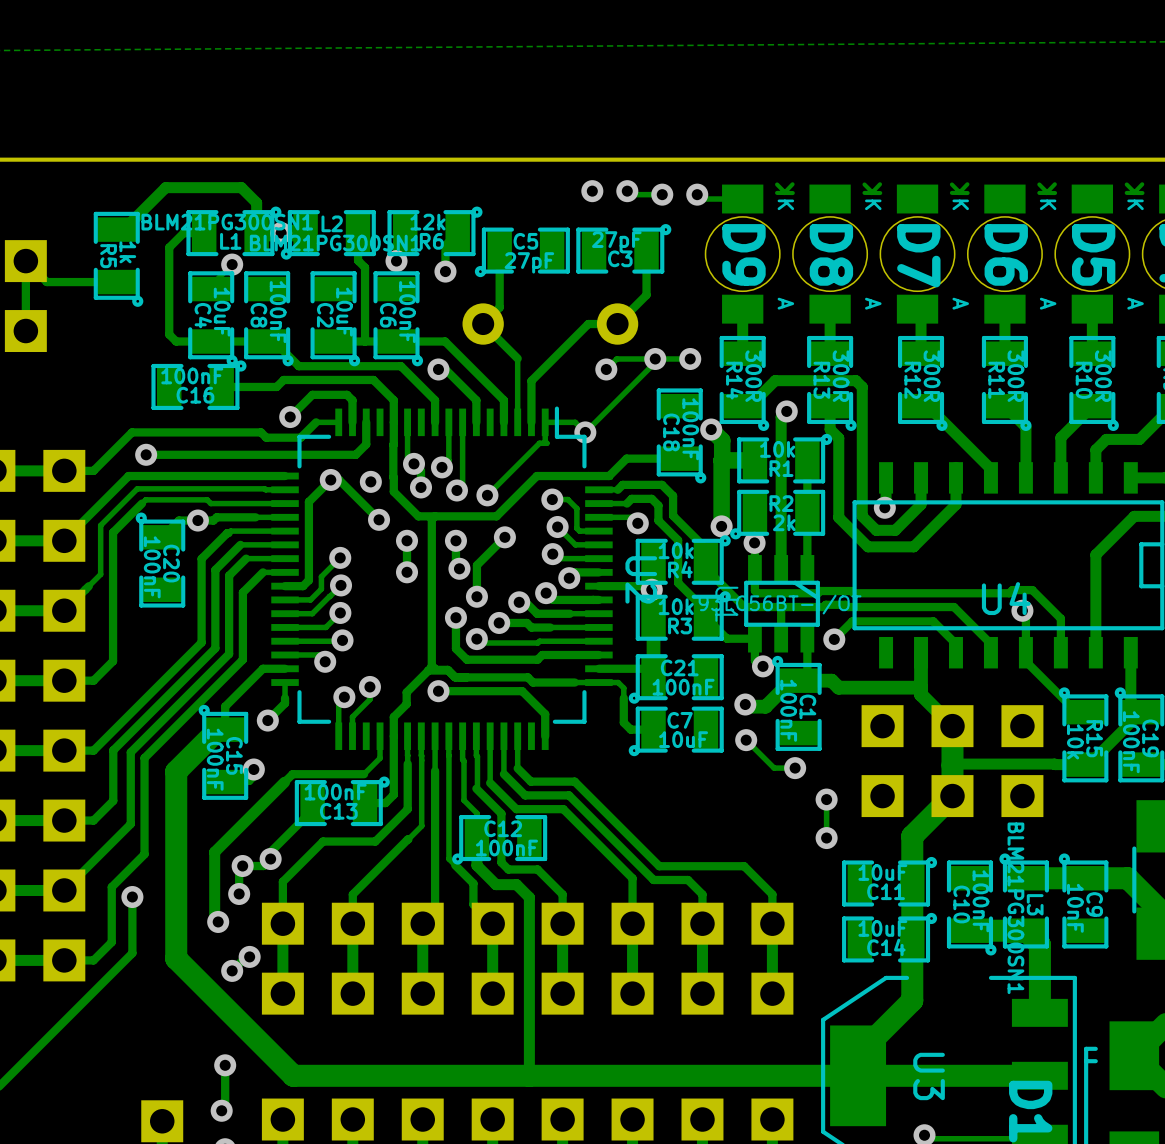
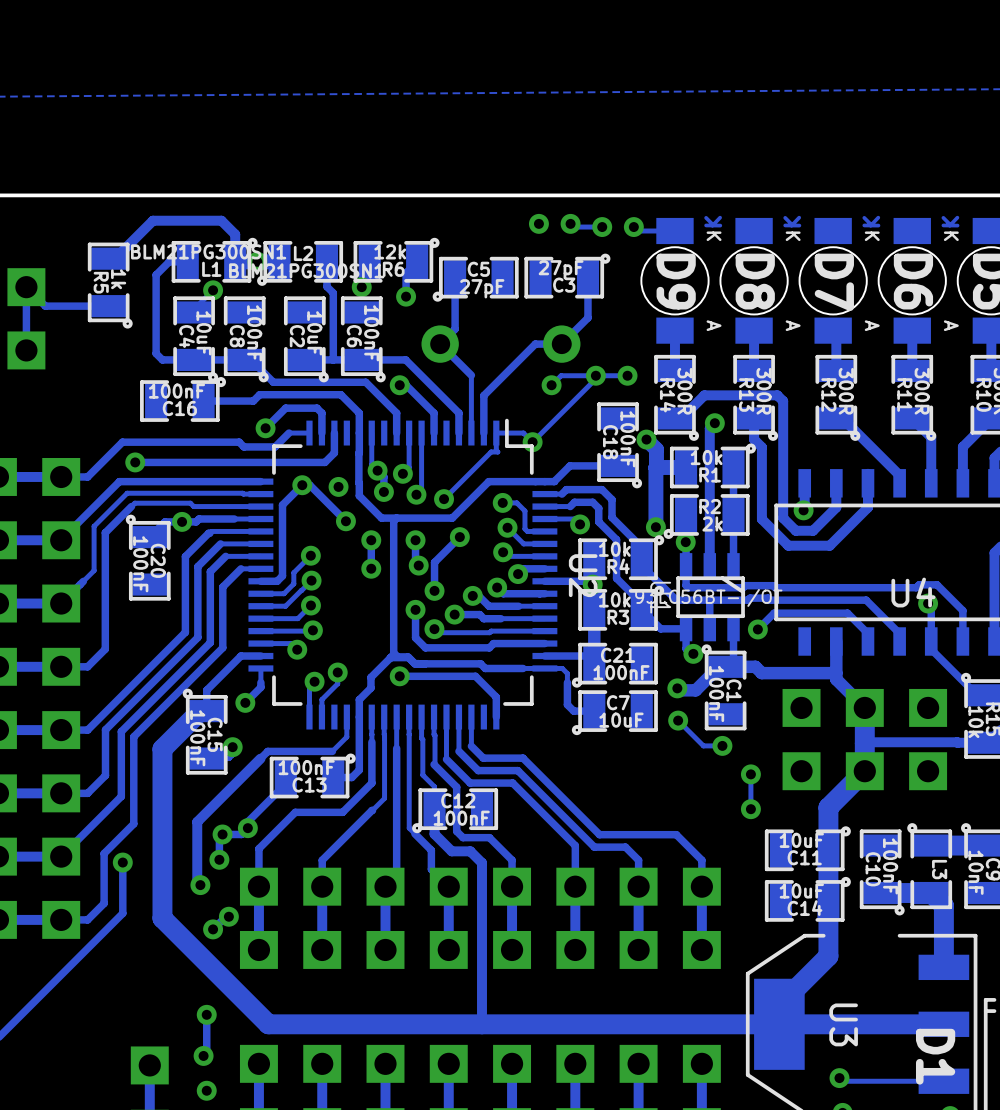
L3 value: BLM21PG300SN1 (1015, 908) -> none

